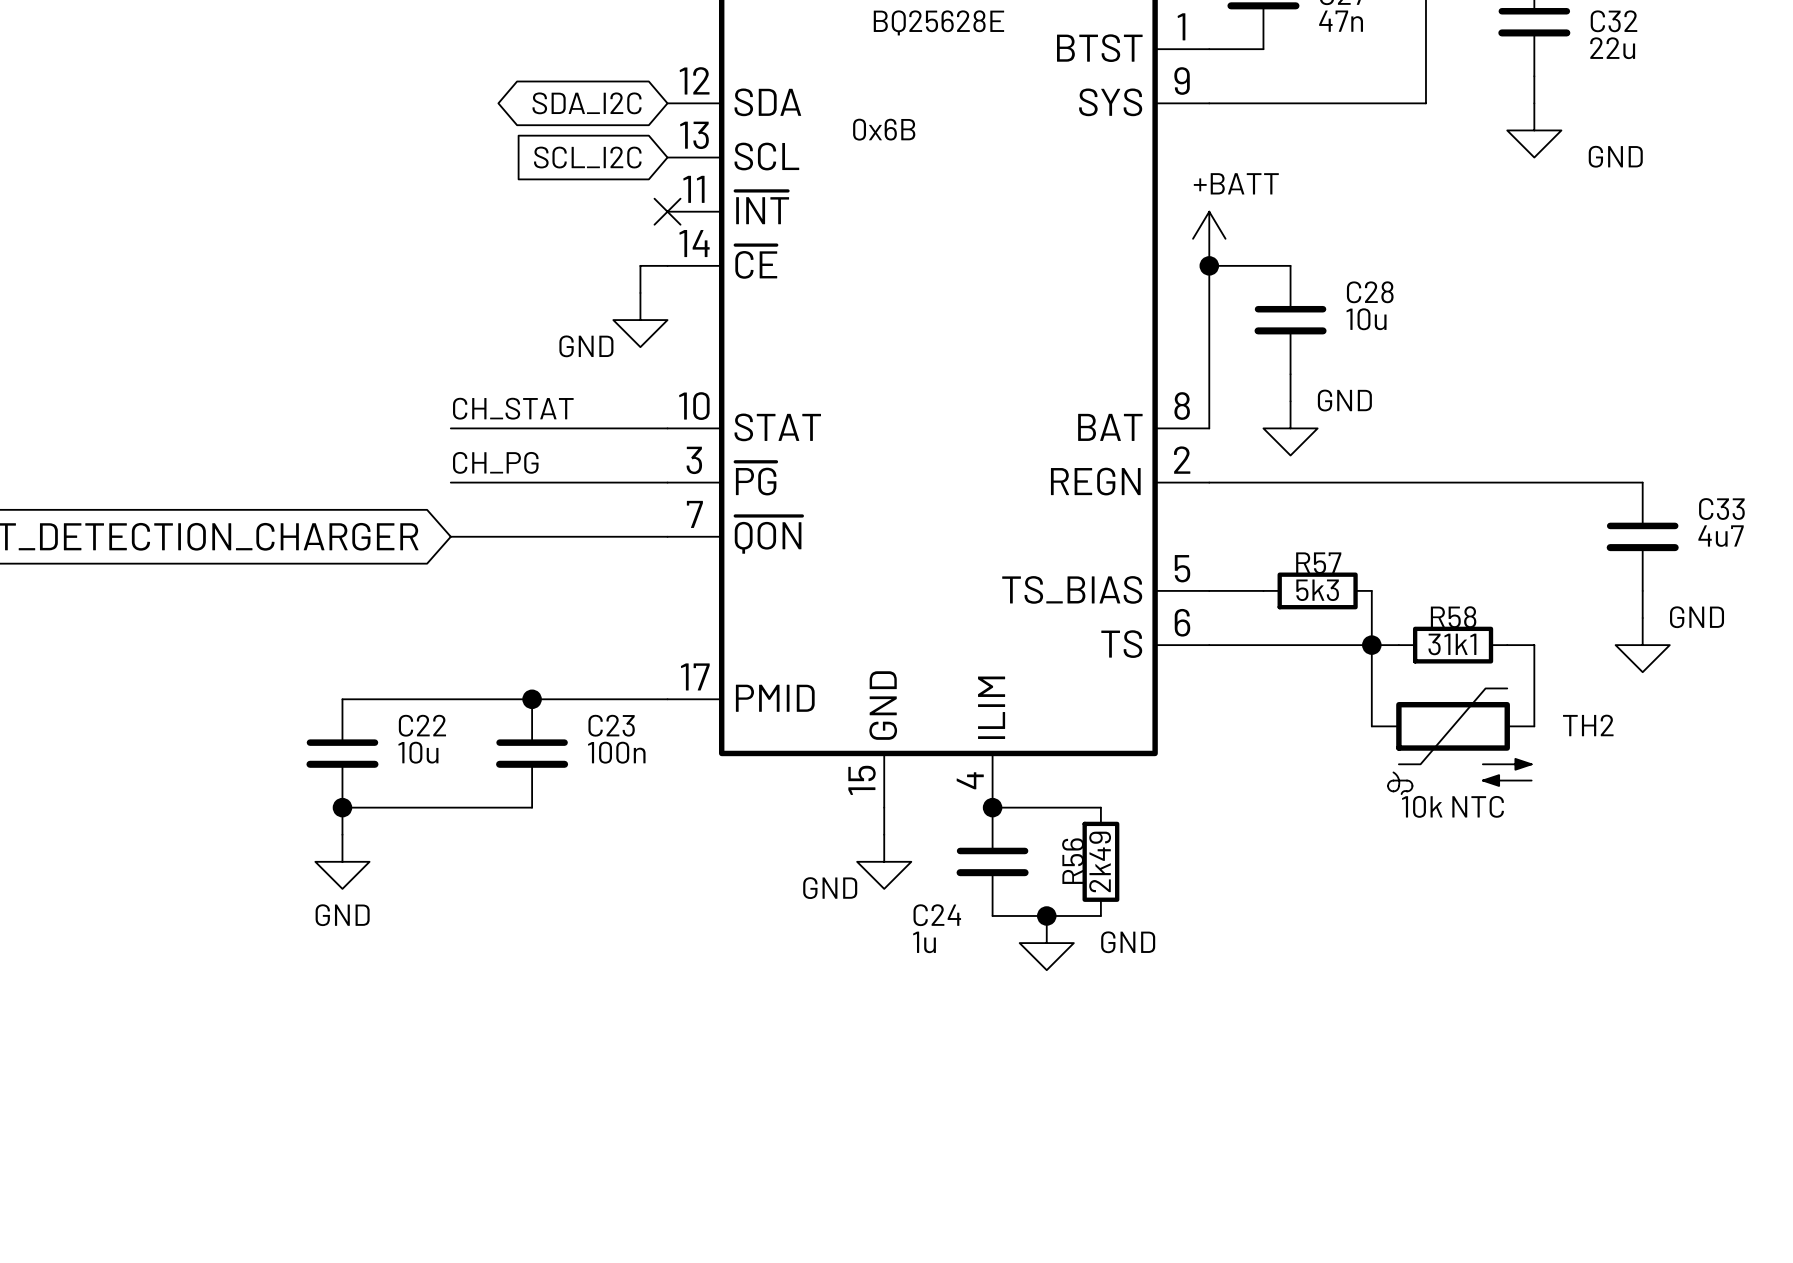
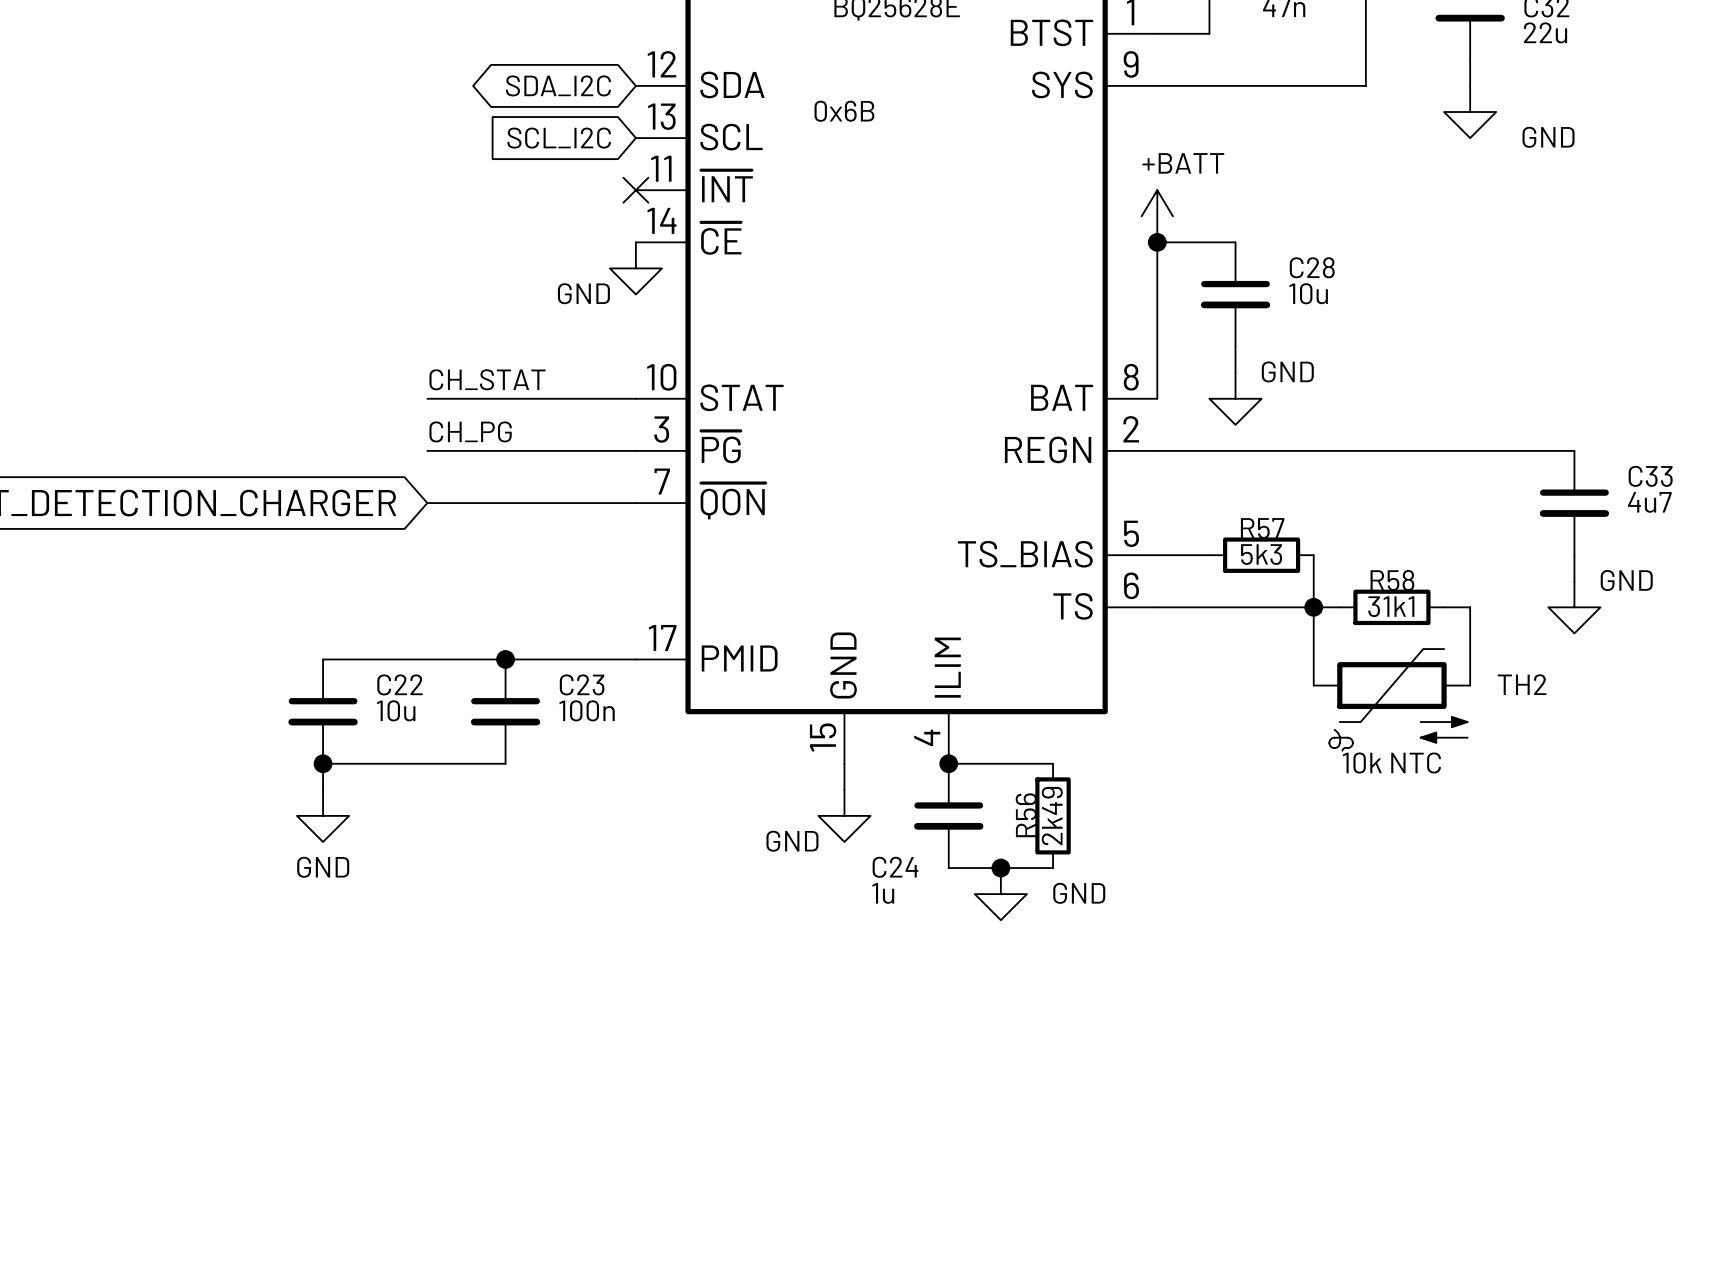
wire: (667, 265) (640, 265) (640, 292) -> none
power symbol position: GND (640, 320) -> GND (635, 268)

